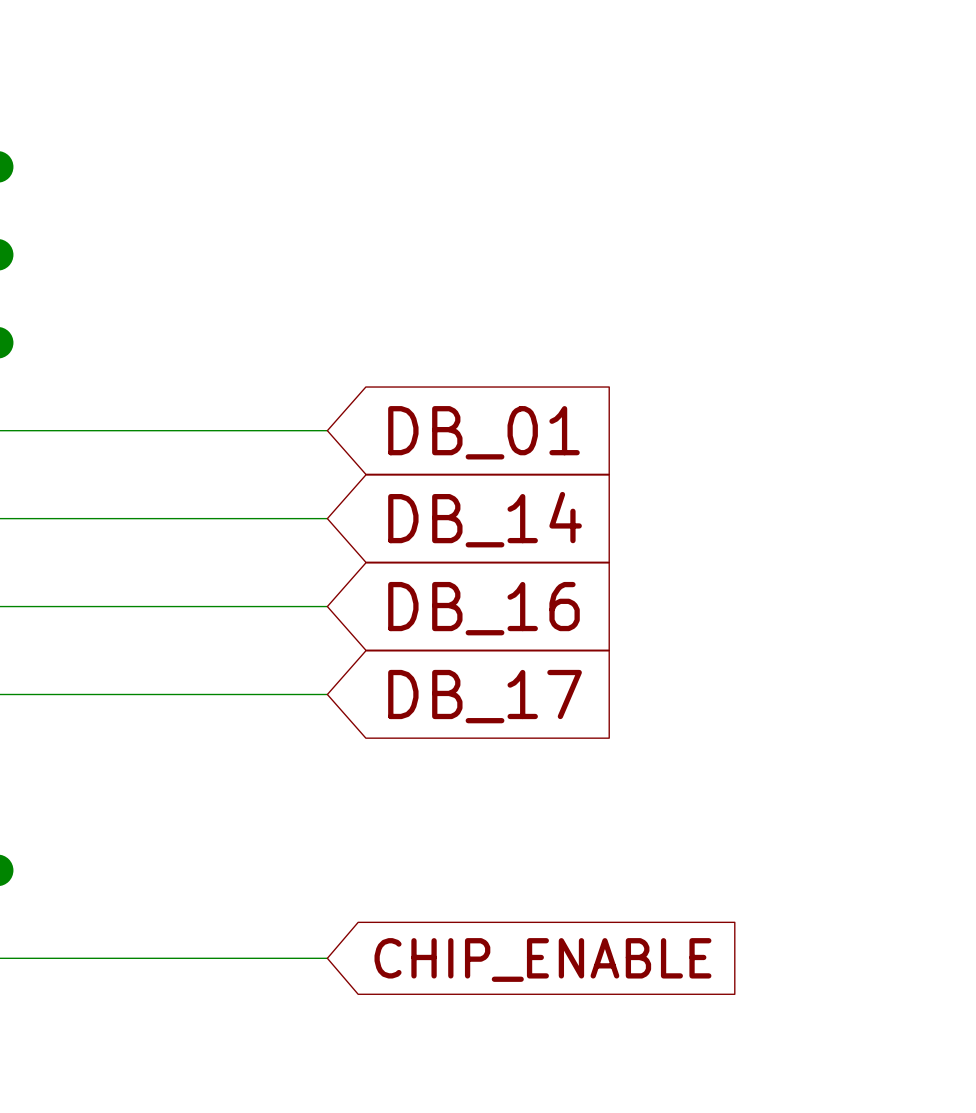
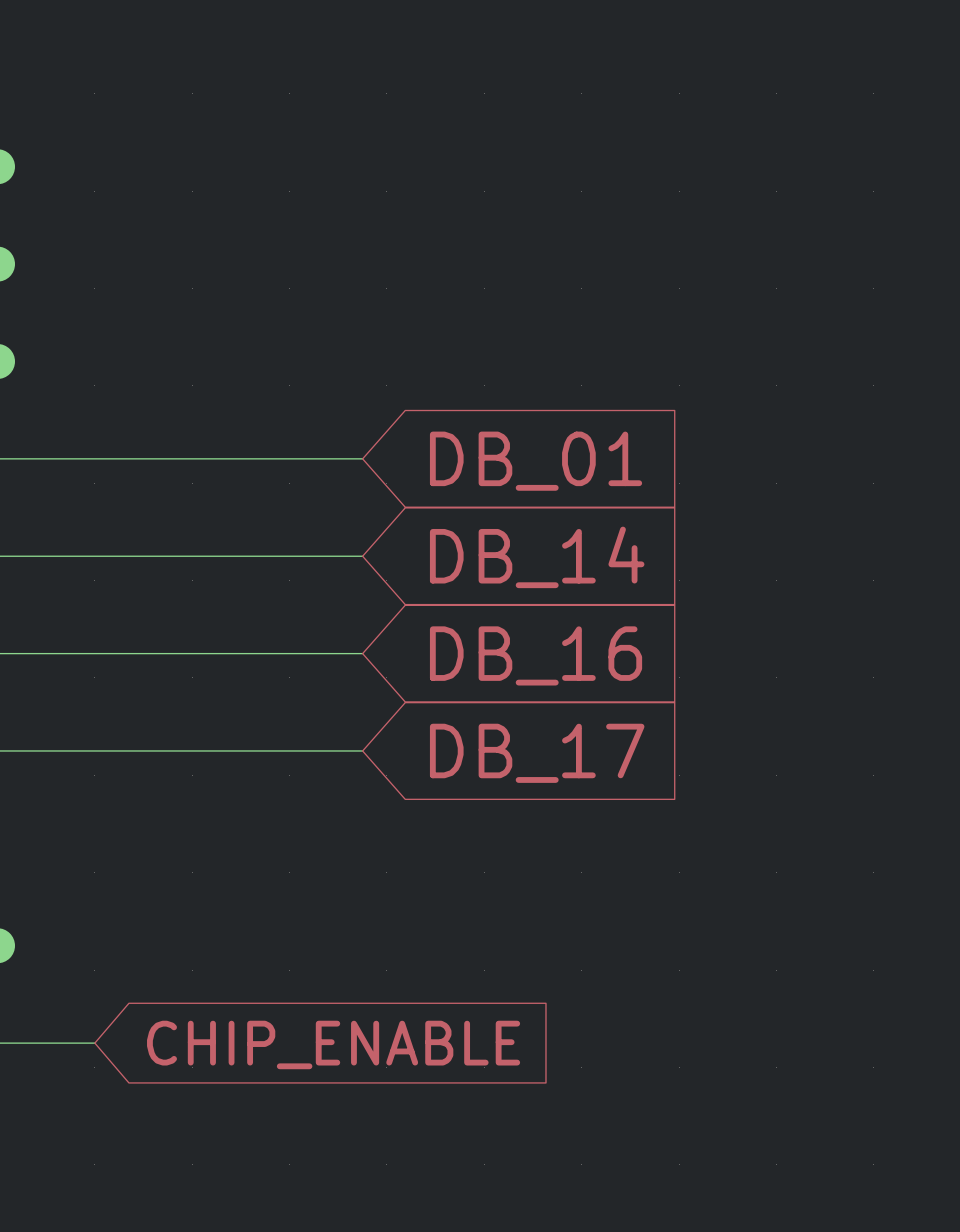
wire: (85, 958) (327, 958) -> none
global label position: CHIP_ENABLE (542, 959) -> CHIP_ENABLE (333, 1044)

